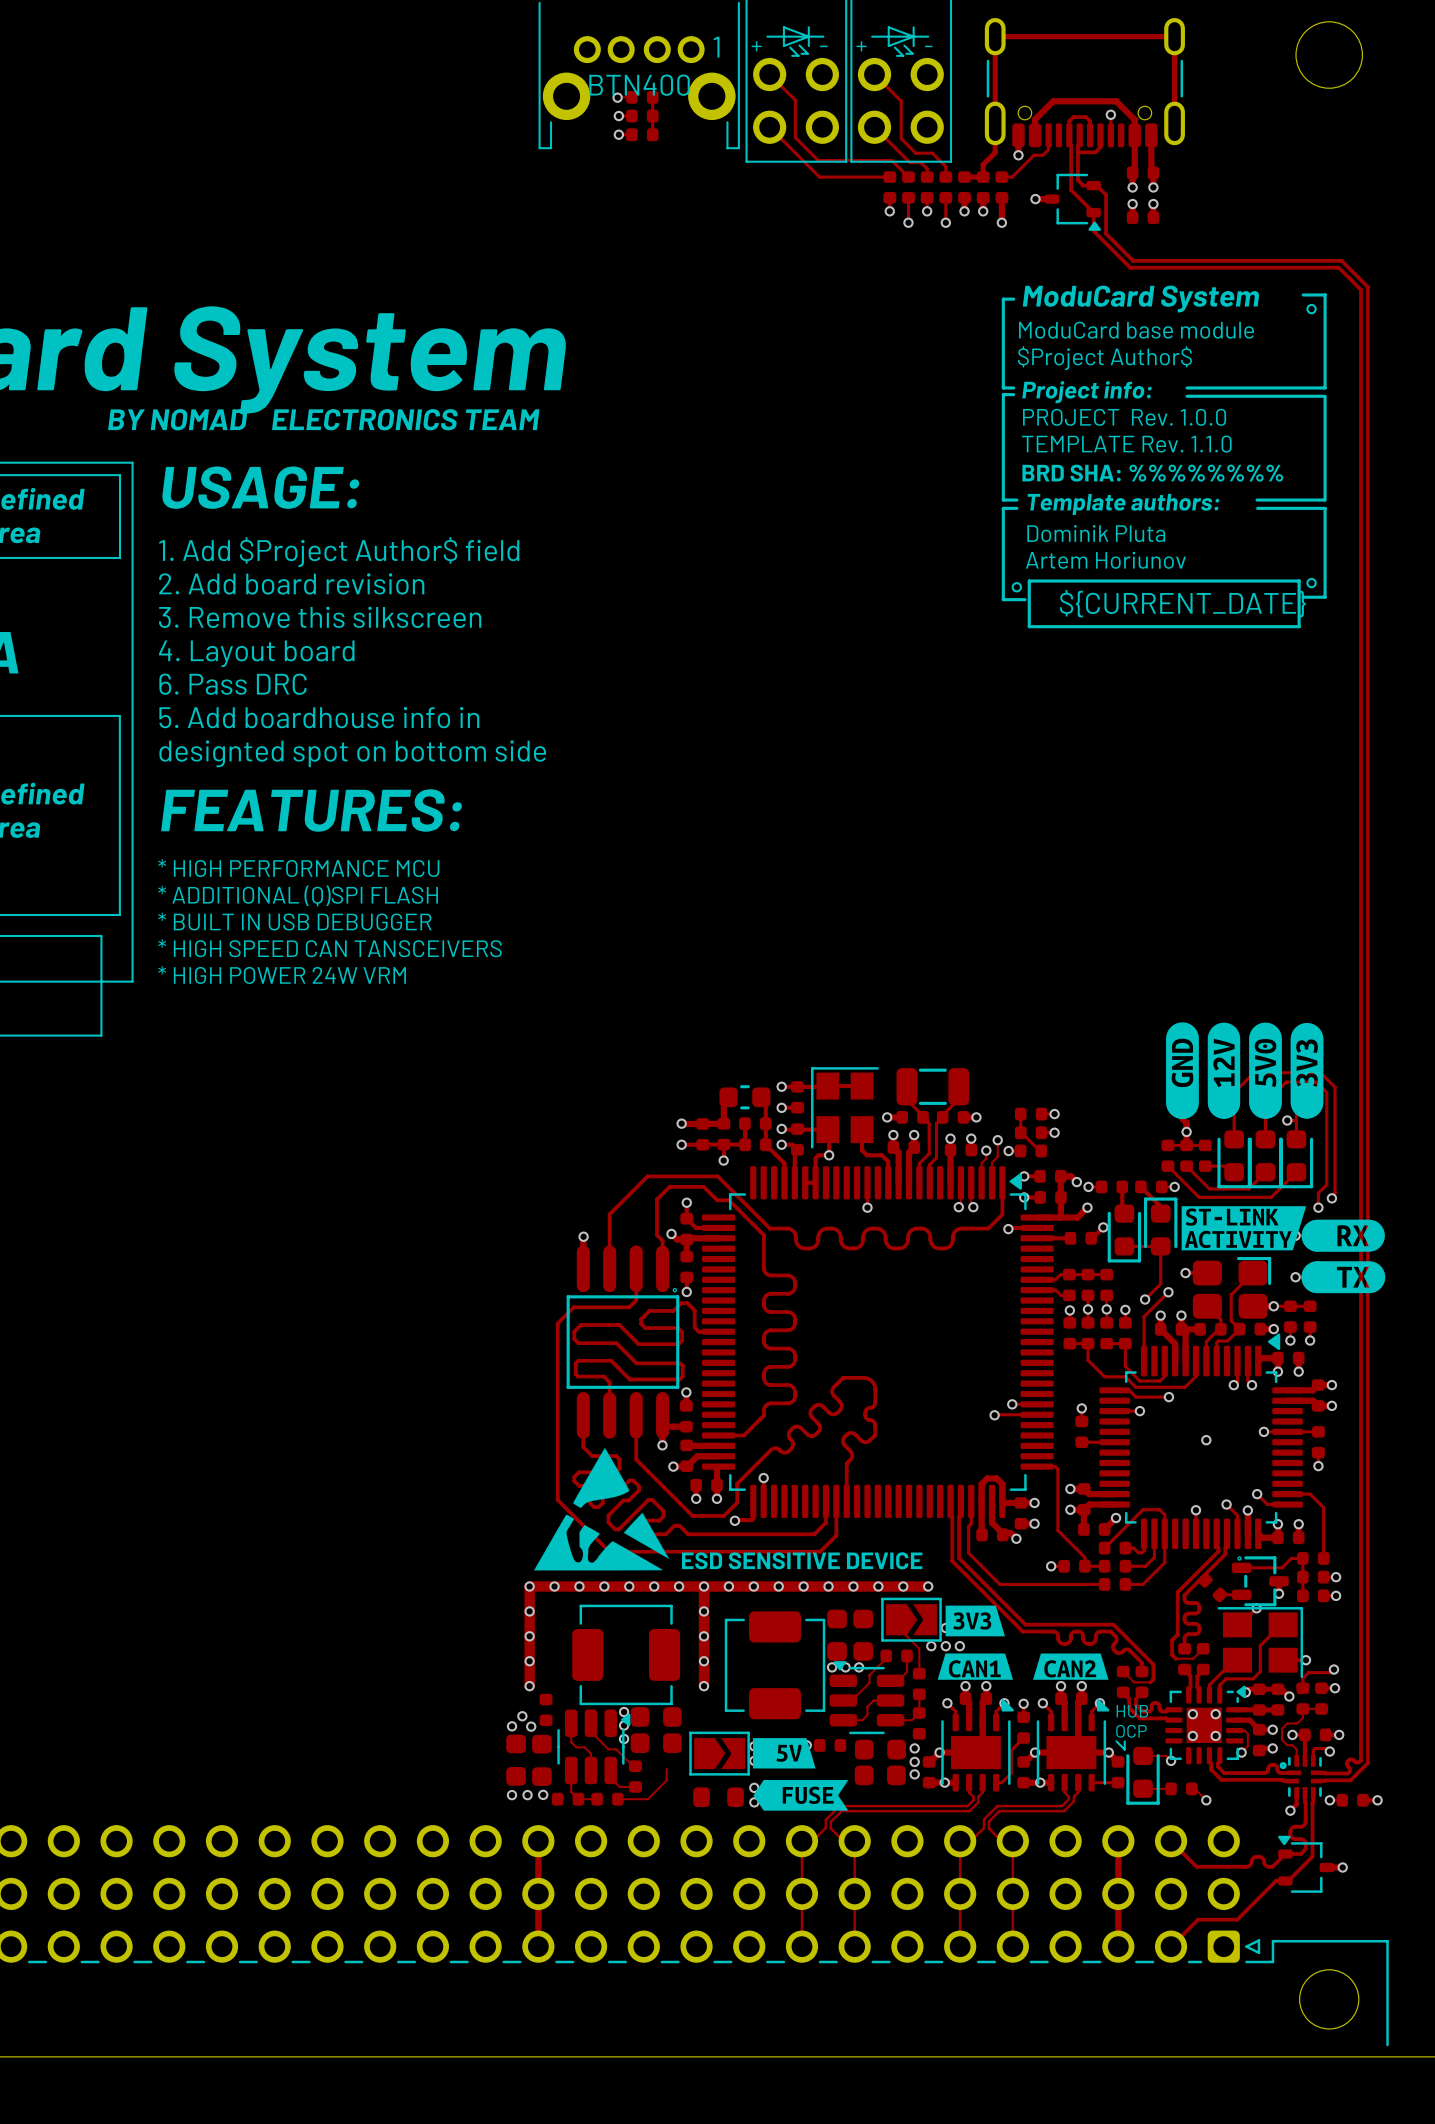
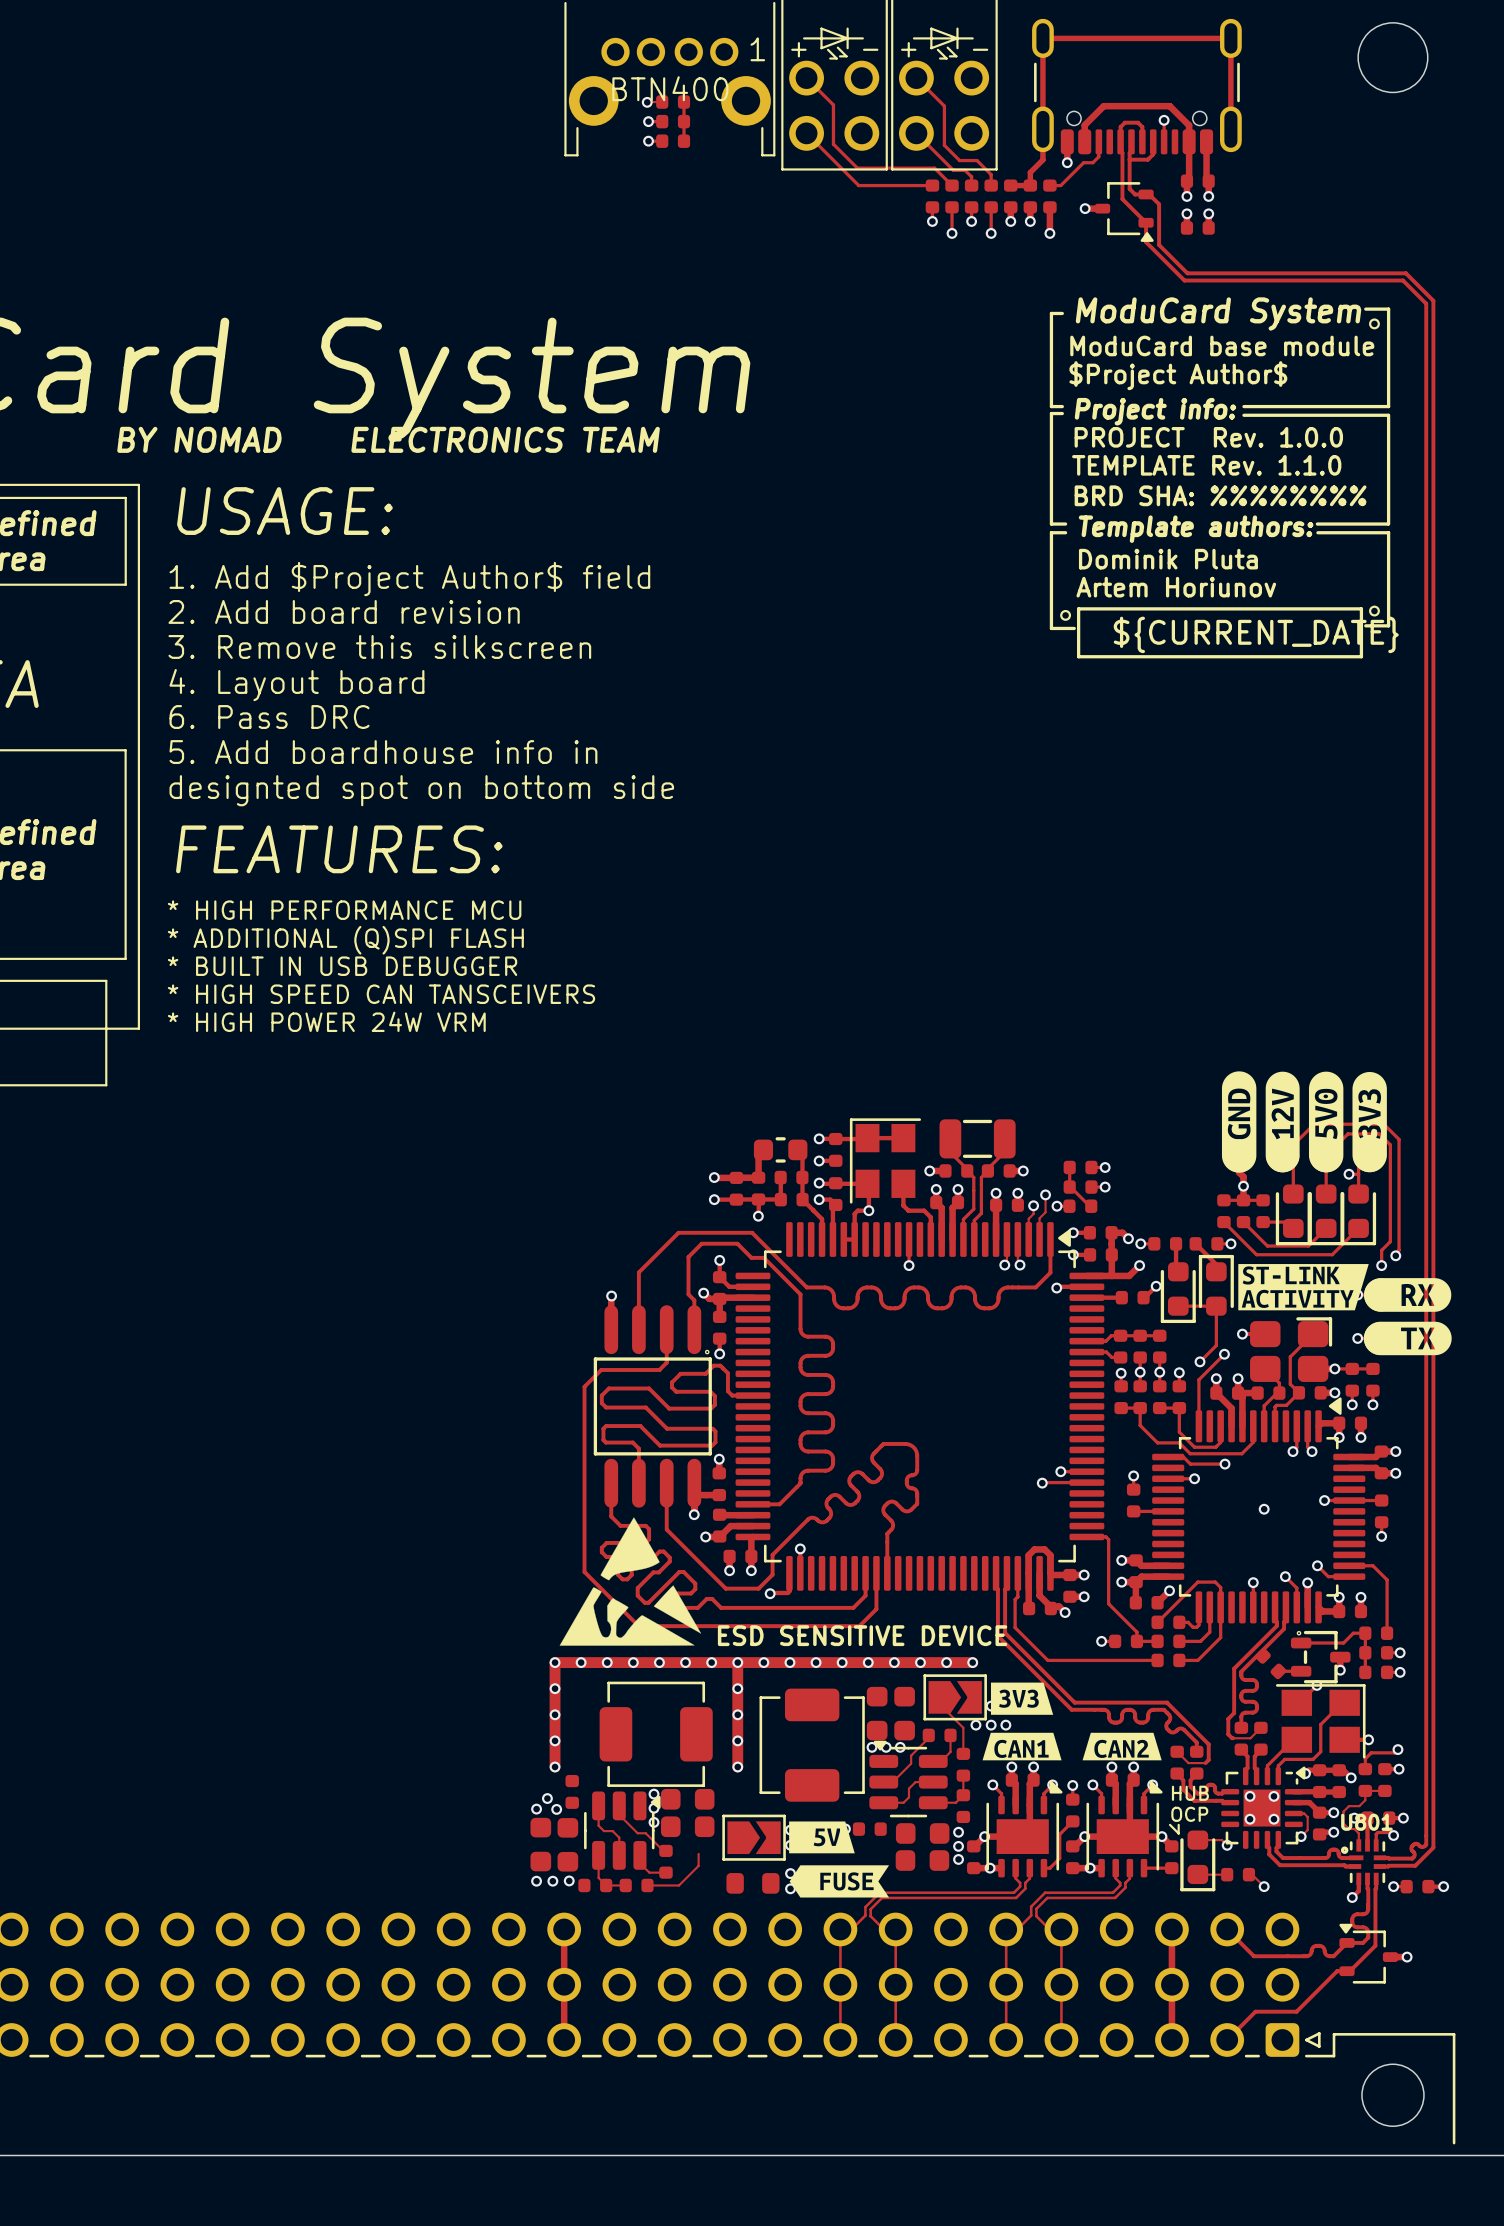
U801 name: none -> U801 (1366, 1822)

